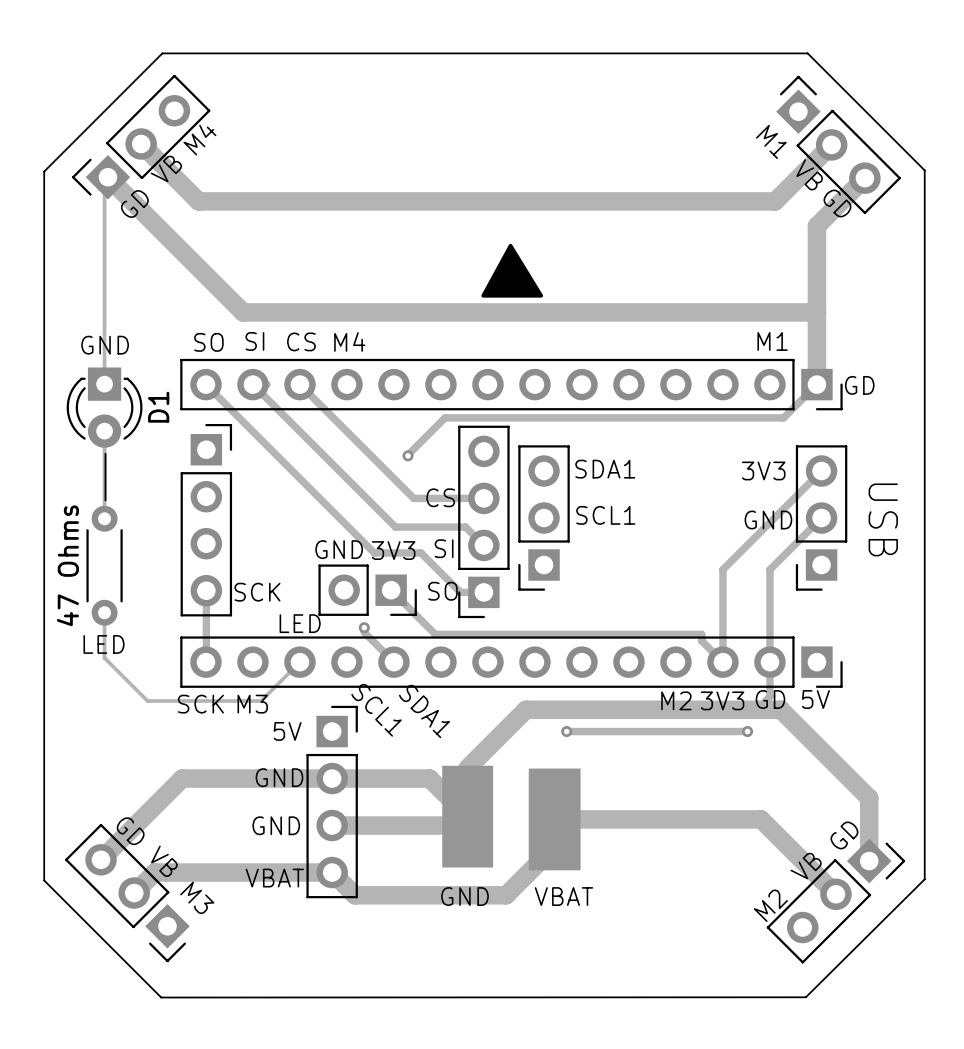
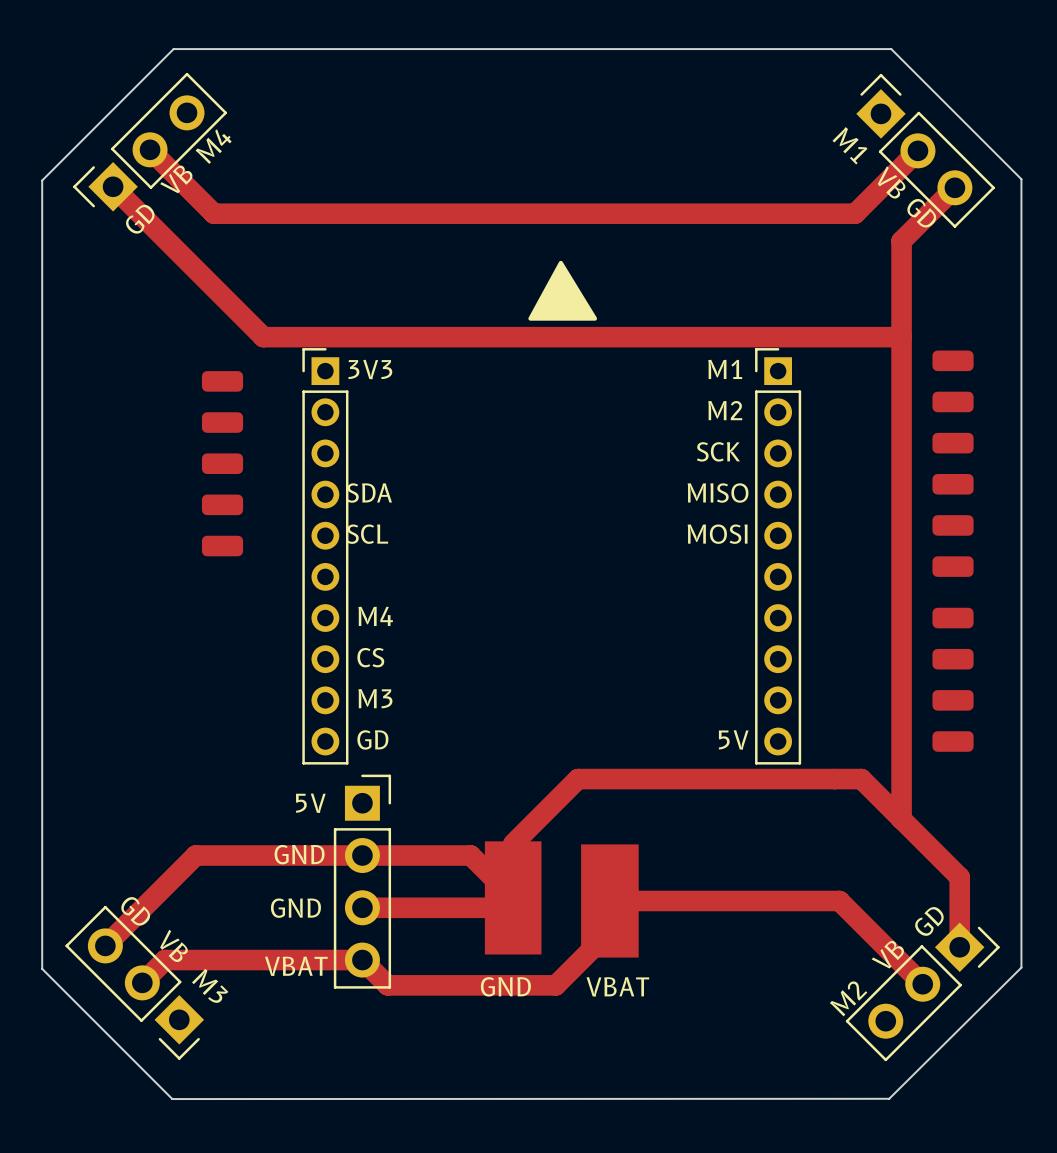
track: (104, 180) (104, 384) -> none
part: none -> (953, 360)
text: SI (254, 341) -> none
text: CS (301, 341) -> none
text position: M4 (349, 341) -> M4 (375, 616)
text position: M1 (772, 341) -> M1 (725, 369)
text: SO (208, 342) -> none
text: GND (105, 345) -> none
part: none -> (222, 381)
part: none -> (953, 401)
track: (205, 384) (374, 552) (420, 552) (460, 592) (483, 592) -> none
track: (267, 384) (252, 384) (395, 527) (465, 527) (483, 545) -> none
track: (299, 384) (413, 498) (483, 498) -> none
part: (511, 384) -> none
track: (816, 384) (783, 417) (445, 417) (408, 455) -> (901, 417) (901, 819)
text: GD (859, 385) -> none
part: none -> (222, 422)
D1: (104, 407) -> none
part: none -> (953, 443)
text: none -> SCK (718, 451)
part: none -> (222, 463)
track: (104, 431) (104, 518) -> none
part: none -> (953, 484)
text: none -> SDA (369, 493)
text: none -> MISO (718, 493)
line: (105, 453) (105, 500) -> none
via: (408, 455) -> none
part: none -> (222, 504)
text: SDA1 (605, 469) -> none
text: 3V3 (763, 470) -> none
track: (821, 471) (722, 569) (722, 662) (701, 640) (701, 634) (435, 634) (391, 590) -> none
part: none -> (953, 525)
text: none -> SCL (367, 534)
text: none -> MOSI (717, 534)
text: CS (440, 497) -> none
part: none -> (222, 546)
part: none -> (325, 556)
part: none -> (778, 556)
text: SCL1 (605, 515) -> none
part: (544, 518) -> none
track: (821, 518) (769, 569) (769, 696) (756, 709) -> none
part: (821, 518) -> none
part: none -> (953, 566)
text: USB (883, 519) -> none
part: (206, 520) -> none
text: GND (768, 520) -> none
part: (483, 521) -> none
text: SI (444, 548) -> none
text: GND (339, 549) -> none
text position: 3V3 (393, 550) -> 3V3 (370, 369)
part: 47 Ohms (104, 565) -> none
part: none -> (953, 618)
track: (206, 590) (205, 662) -> none
part: (367, 590) -> none
text: SO (442, 591) -> none
text: SCK (257, 592) -> none
text: none -> CS (370, 657)
part: none -> (953, 659)
track: (104, 612) (104, 657) (147, 701) (261, 701) (299, 662) -> none
text: LED (300, 623) -> none
track: (364, 627) (364, 632) (393, 662) -> none
via: (364, 627) -> none
part: none -> (953, 700)
text: LED (104, 644) -> none
part: (511, 662) -> none
text: none -> GD (372, 739)
part: none -> (953, 741)
text: GD (770, 699) -> none
text position: 5V (815, 699) -> 5V (733, 739)
text position: M2 (676, 700) -> M2 (725, 410)
text: 3V3 (722, 700) -> none
text: SCK (200, 704) -> none
text position: M3 (252, 704) -> M3 (375, 698)
text: SCL1 (376, 710) -> none
text: SDA1 (424, 711) -> none
track: (566, 731) (746, 731) -> none
via: (566, 731) -> none
via: (747, 731) -> none

